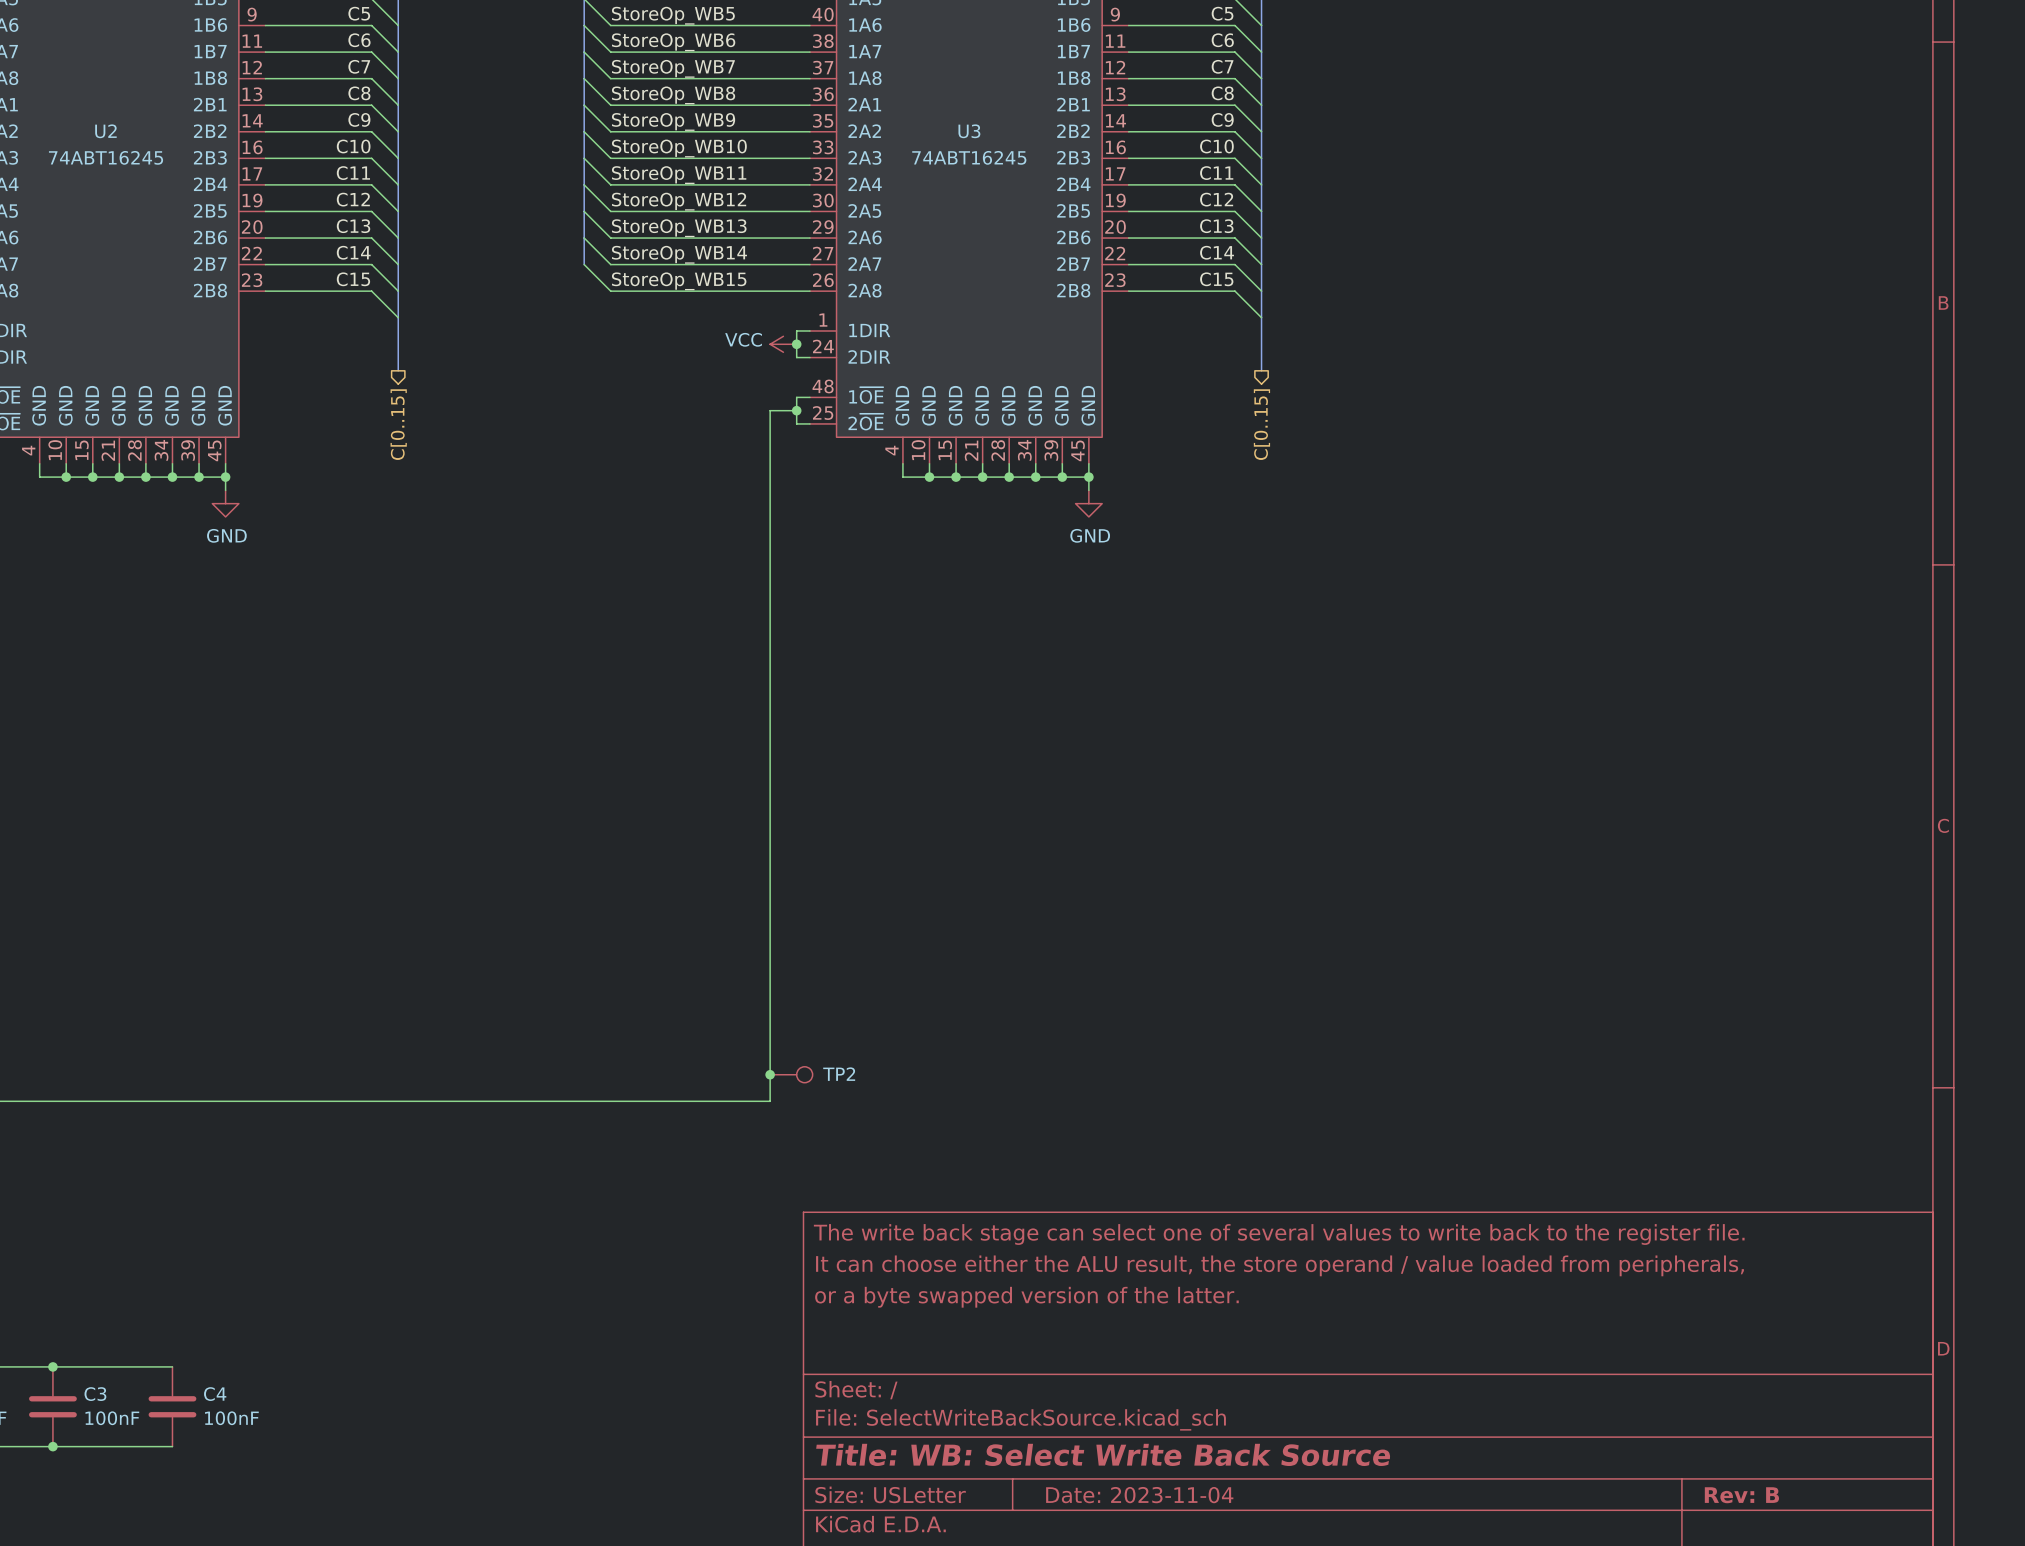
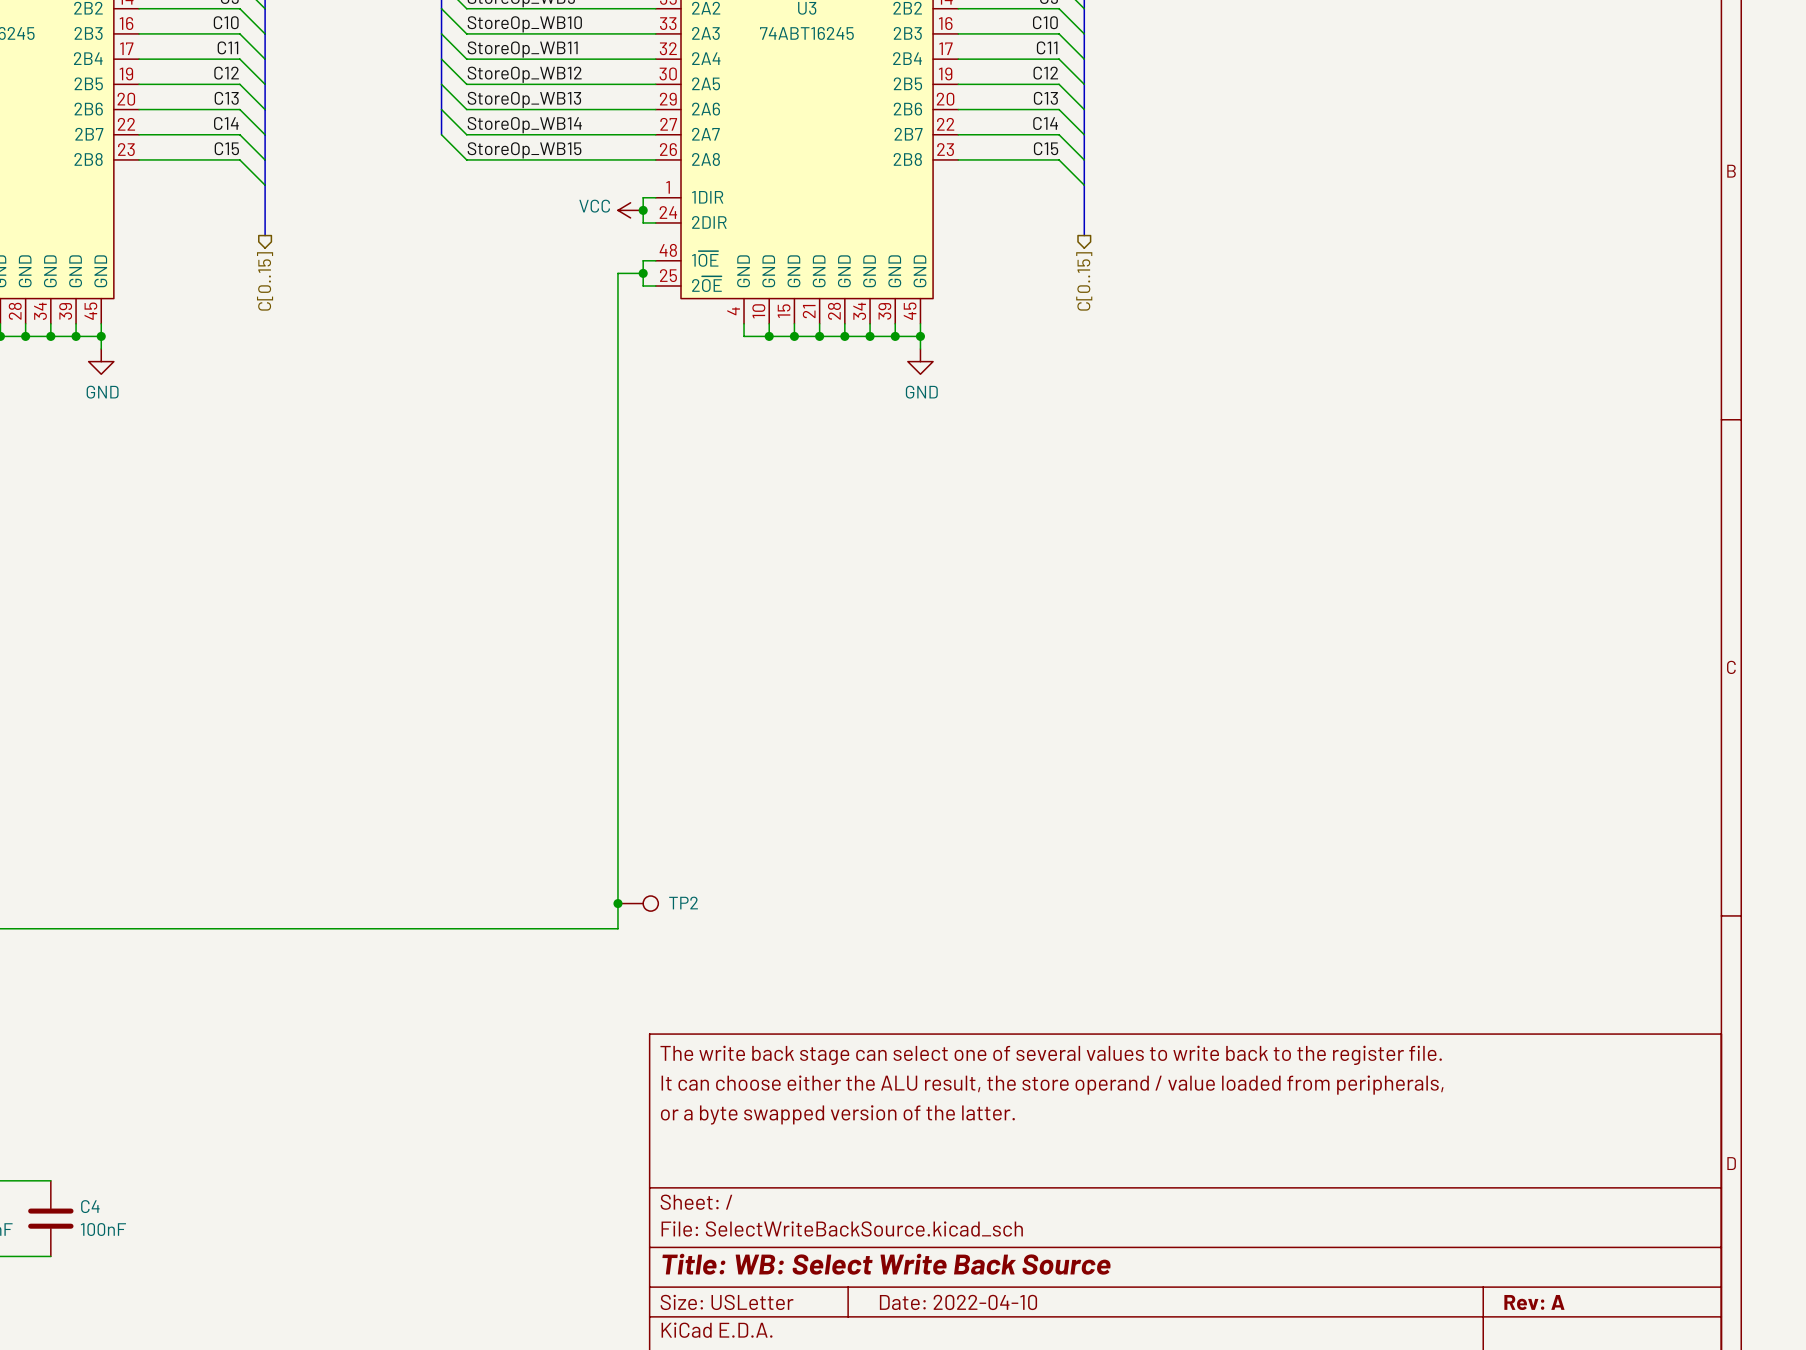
title block: Date: 2023-11-04 (1139, 1495) -> Date: 2022-04-10 (958, 1302)
title block: Rev: B (1741, 1495) -> Rev: A (1534, 1302)

